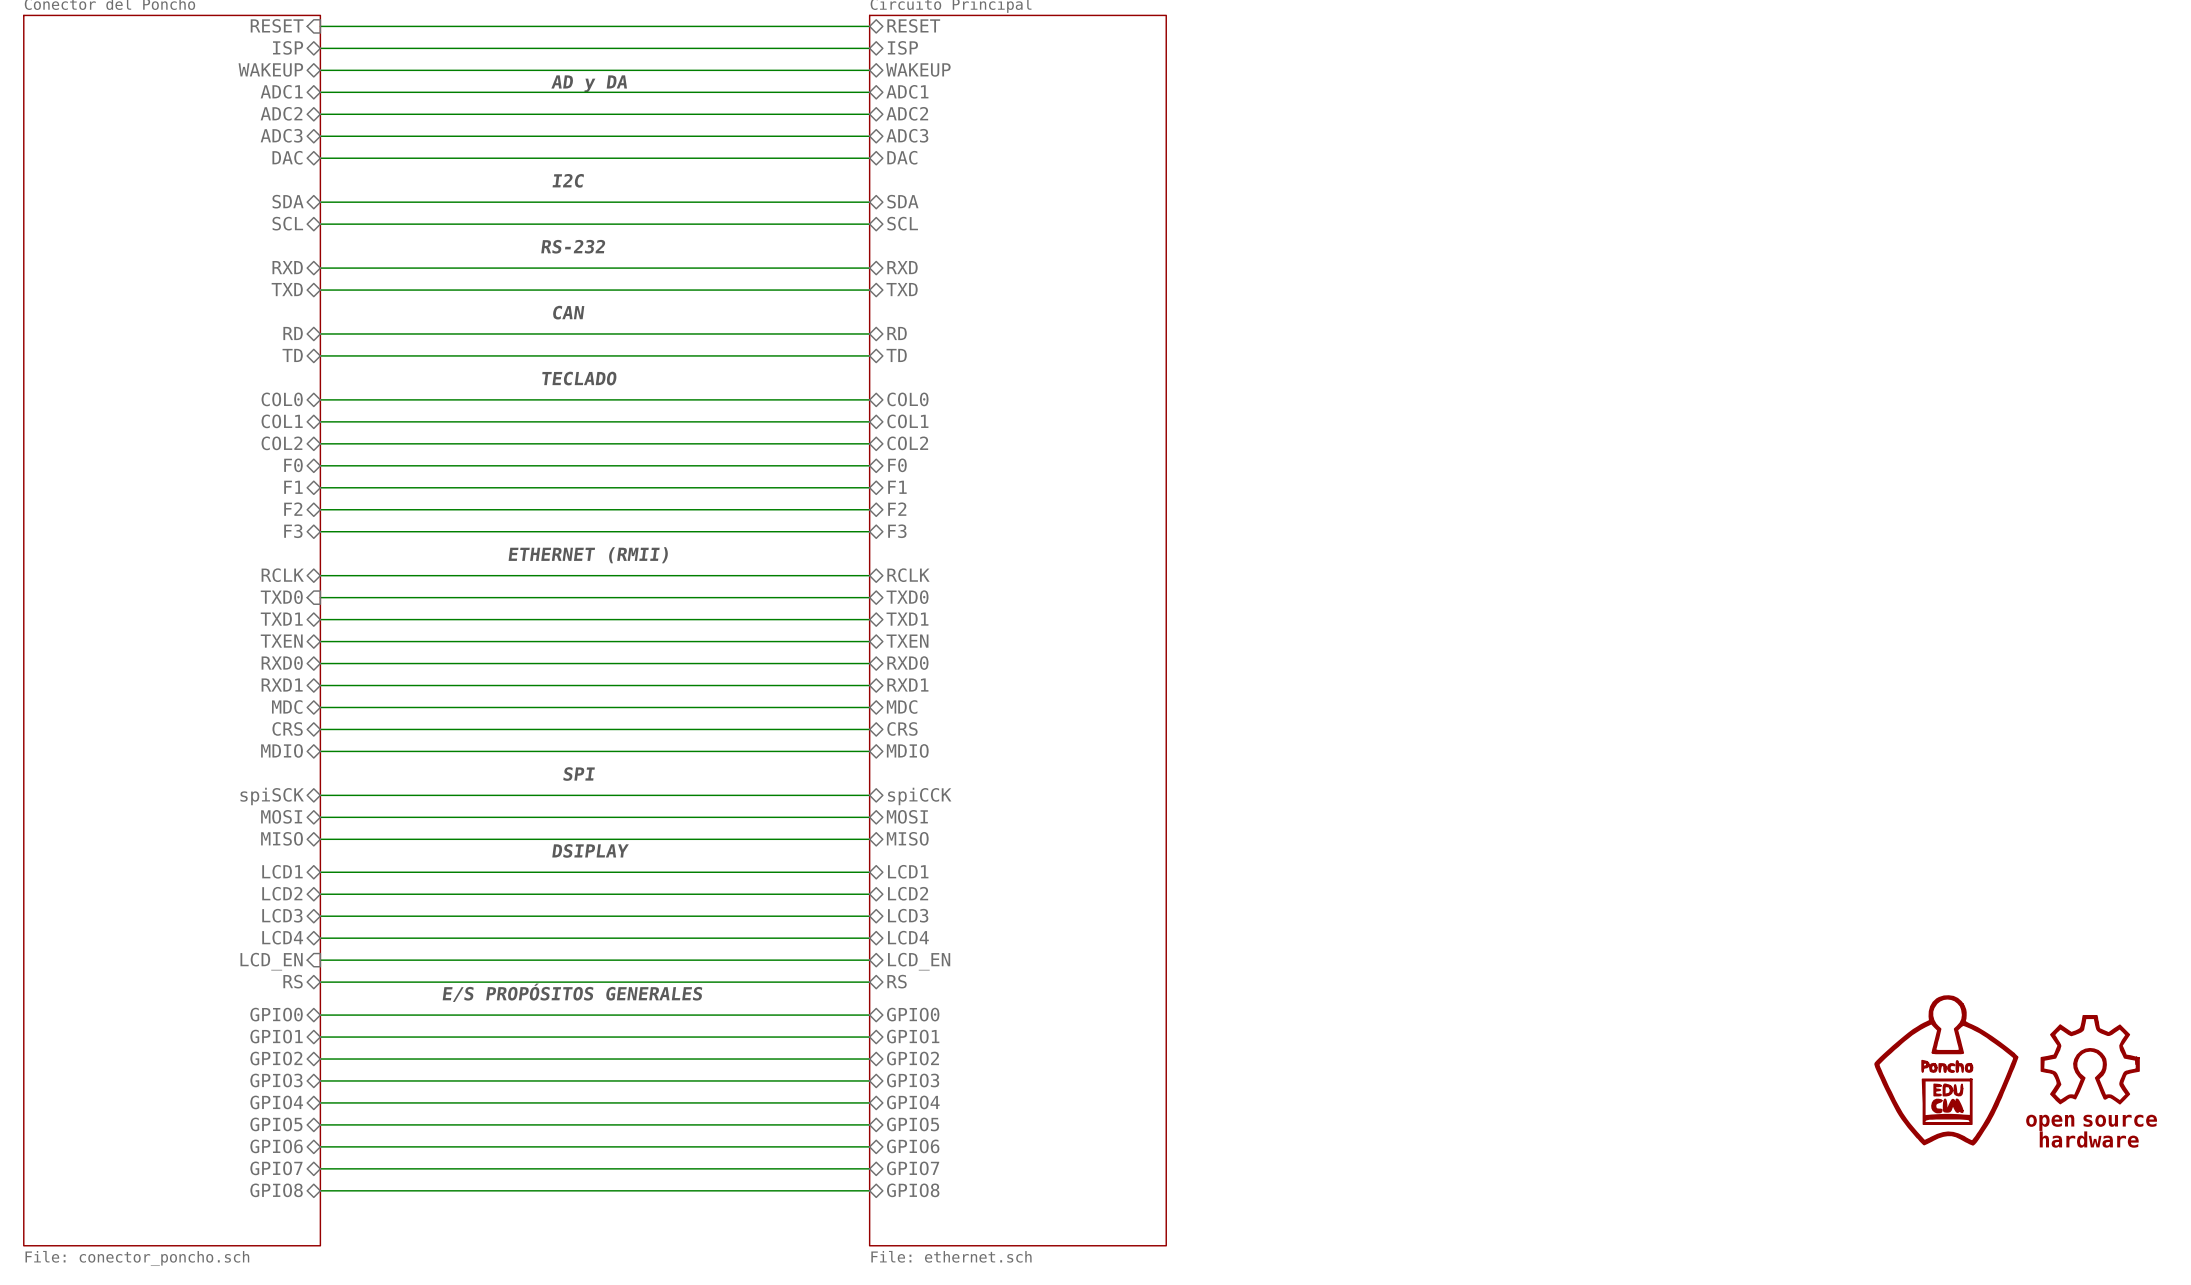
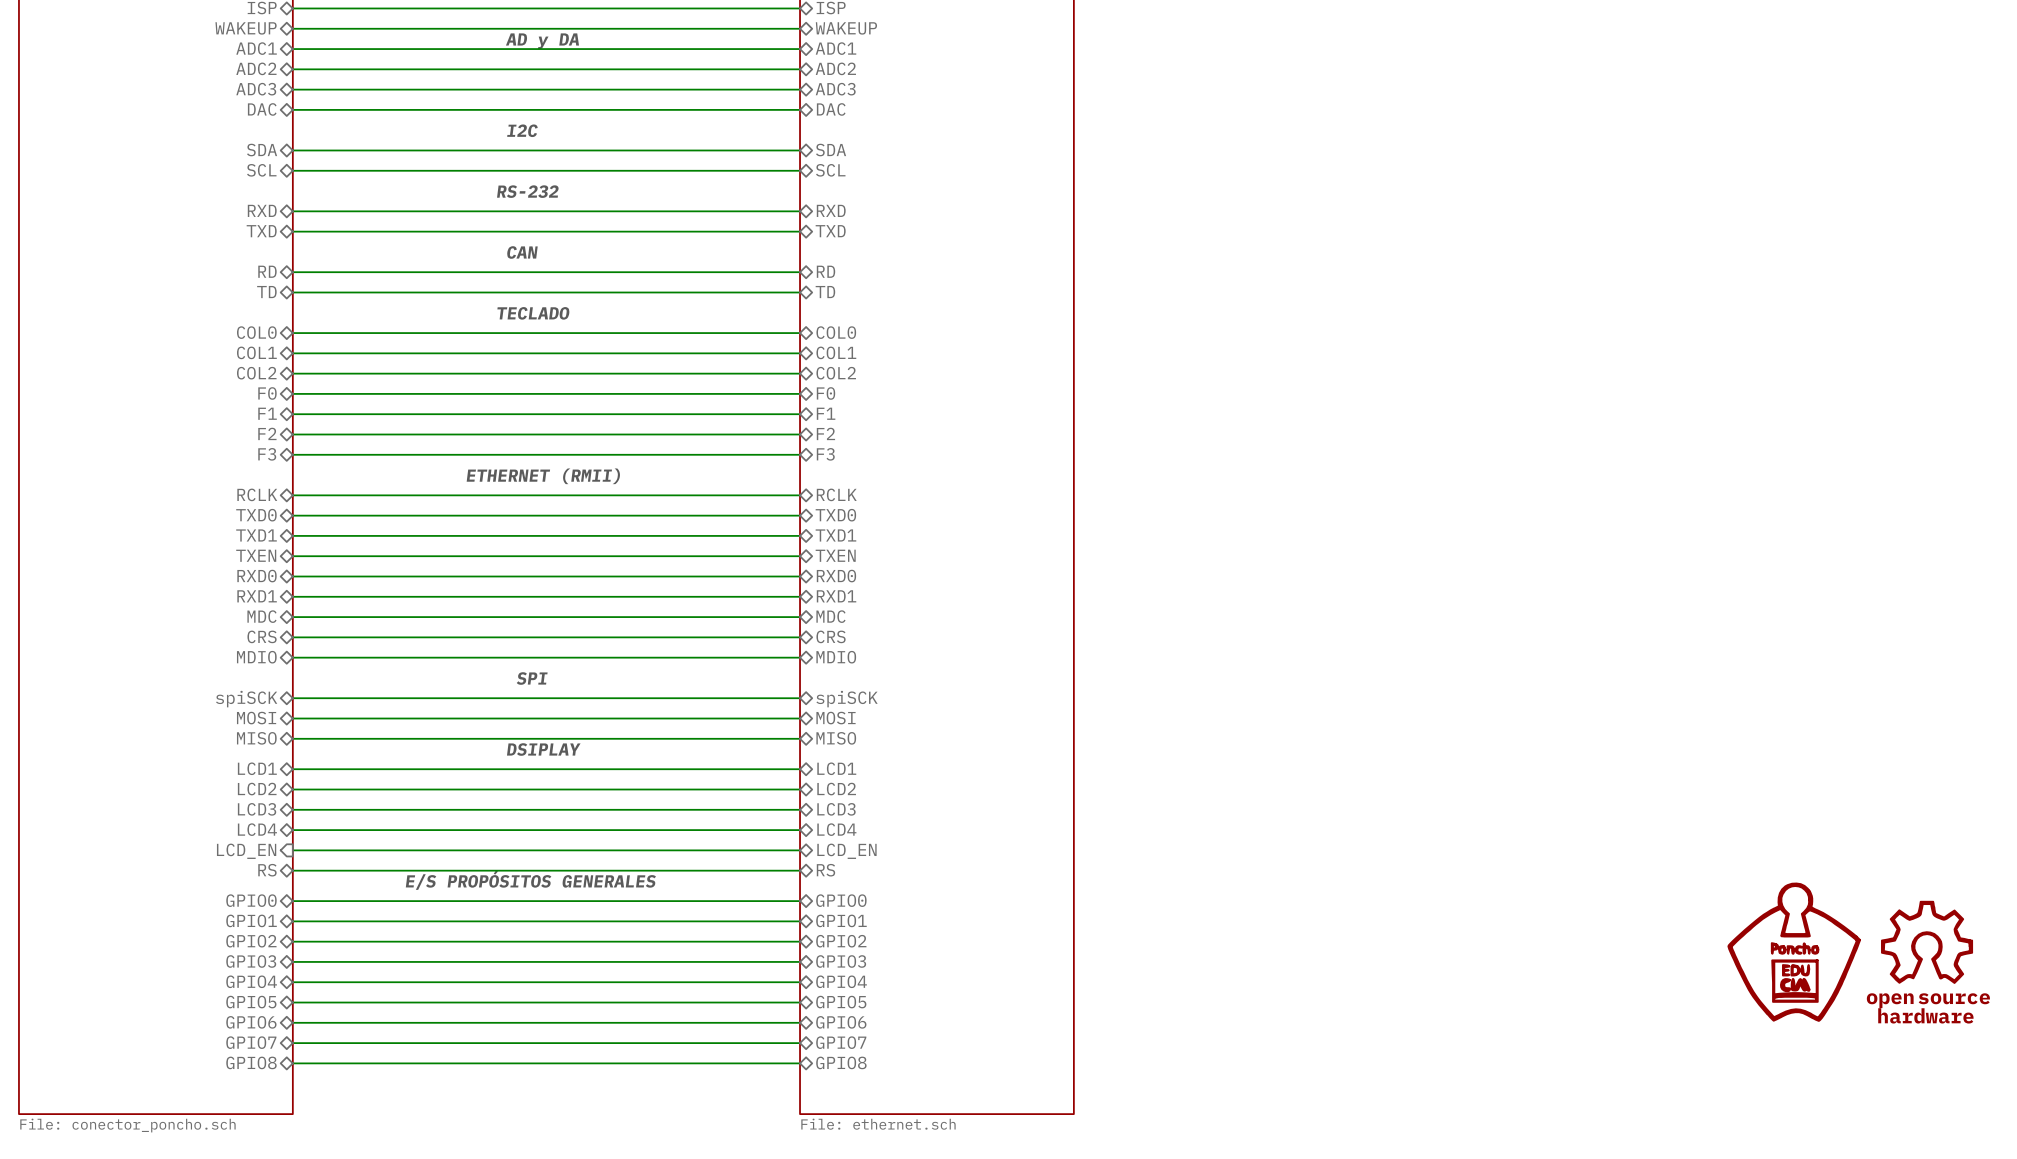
sheet pin shape: input (281, 597) -> bidirectional (256, 515)
sheet pin: spiCCK (919, 796) -> spiSCK (847, 699)

